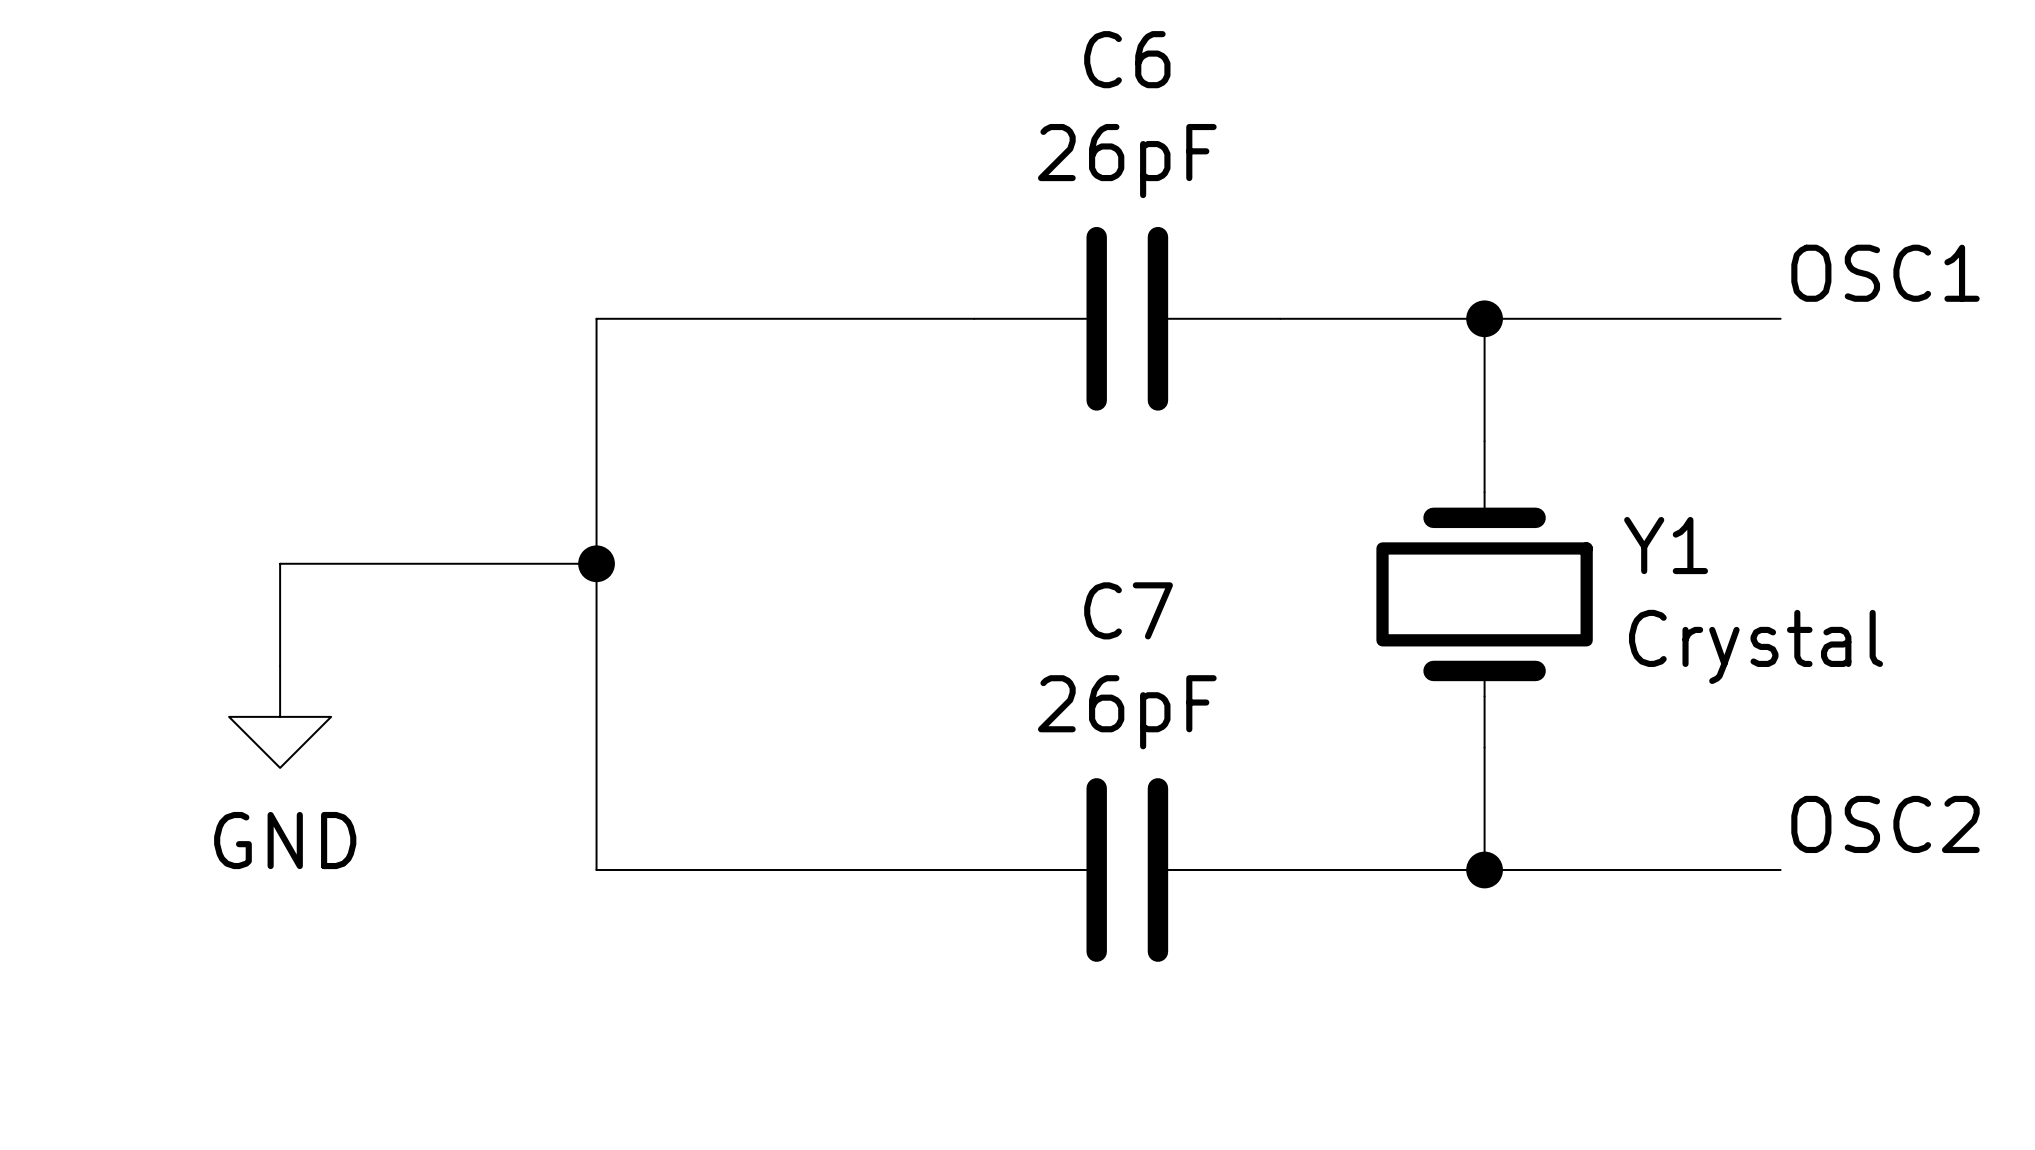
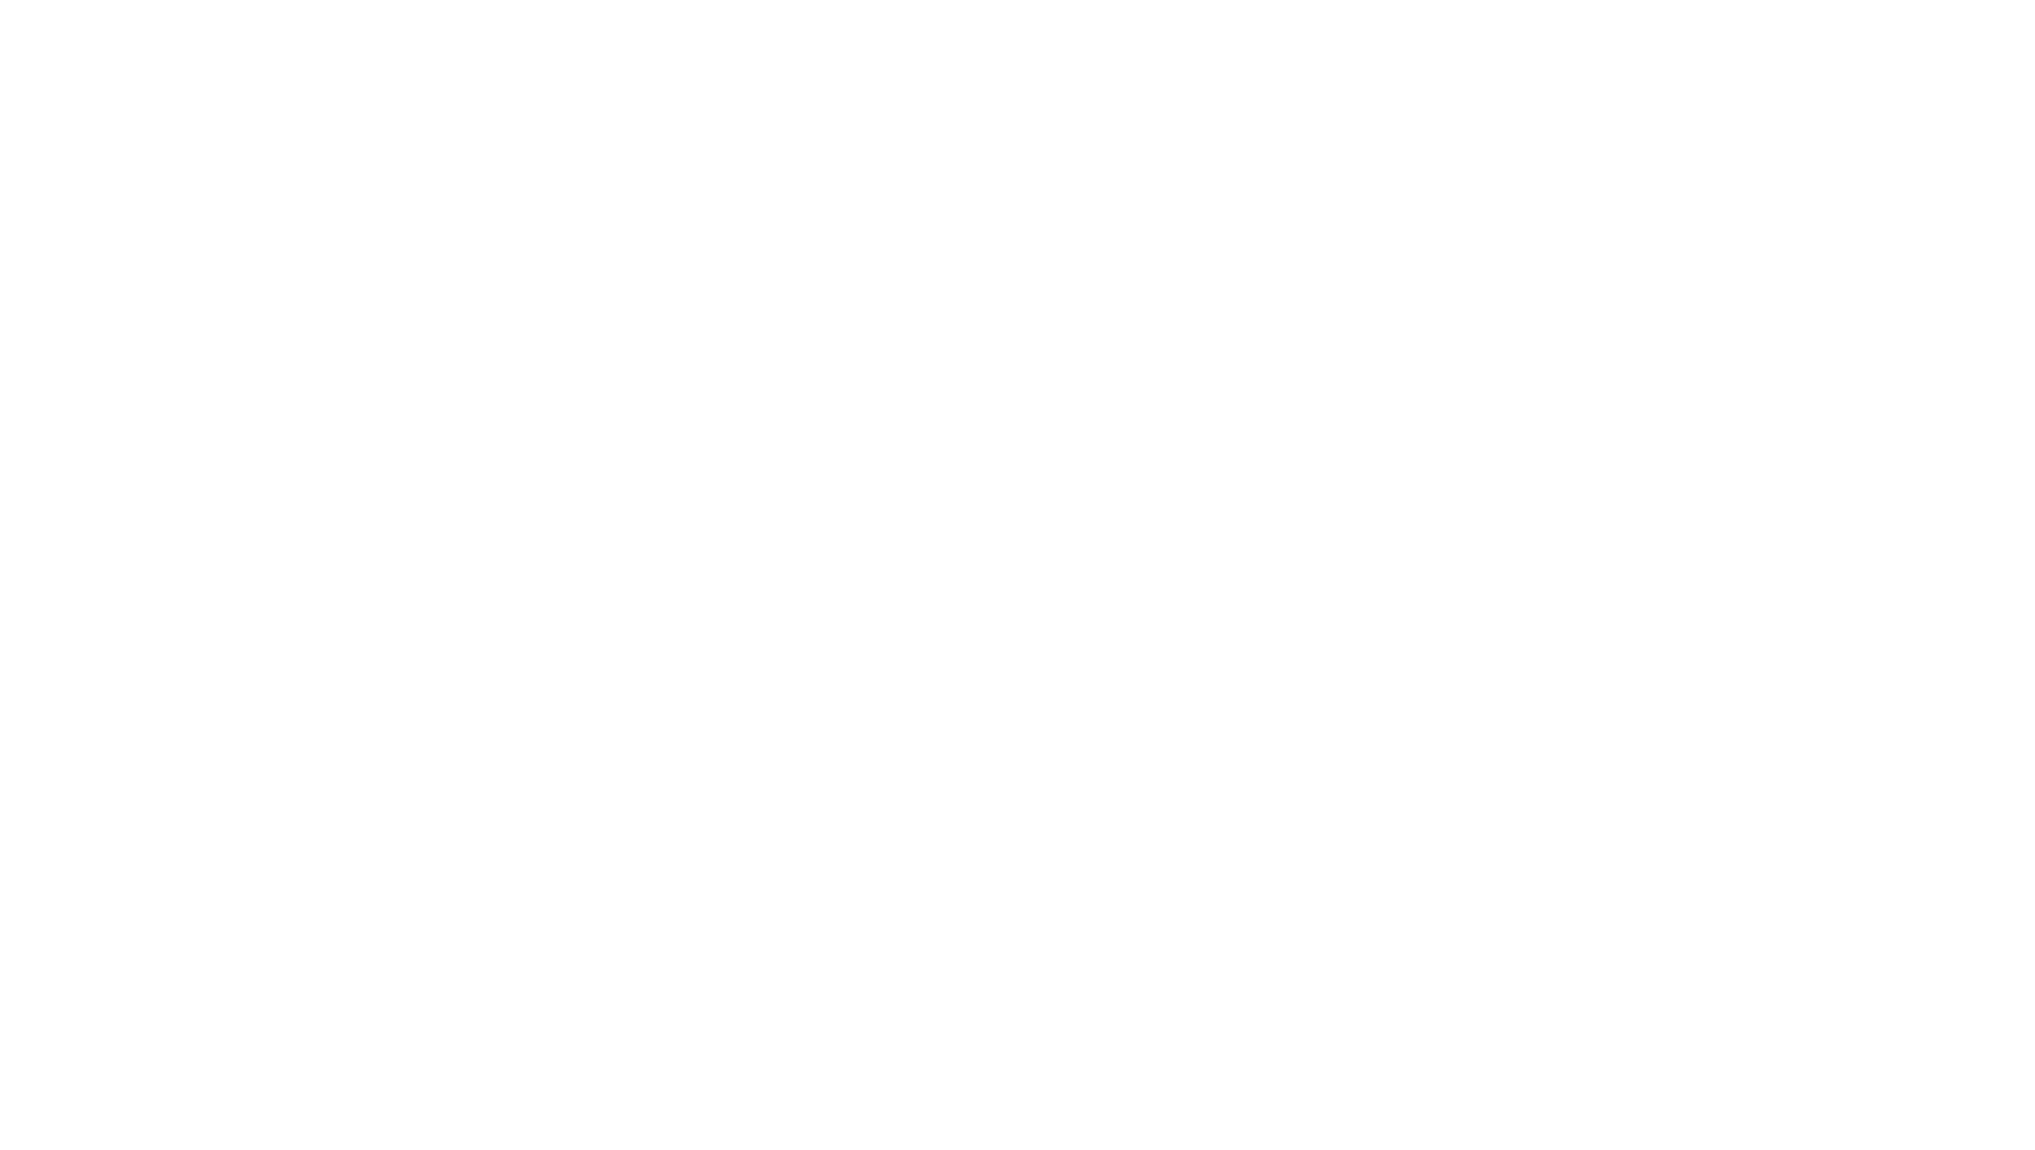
label: OSC1 (1885, 273) -> none
wire: (974, 318) (596, 318) (596, 869) (974, 869) -> none
C6: 26pF (1127, 318) -> none
wire: (1280, 318) (1780, 318) -> none
wire: (1484, 318) (1484, 441) -> none
junction: (1484, 318) -> none
wire: (596, 563) (280, 563) (280, 665) -> none
junction: (596, 563) -> none
Y1: Crystal (1484, 594) -> none
power symbol: GND (280, 716) -> none
wire: (1484, 747) (1484, 869) -> none
label: OSC2 (1885, 824) -> none
C7: 26pF (1127, 869) -> none
wire: (1280, 869) (1780, 869) -> none
junction: (1484, 869) -> none

